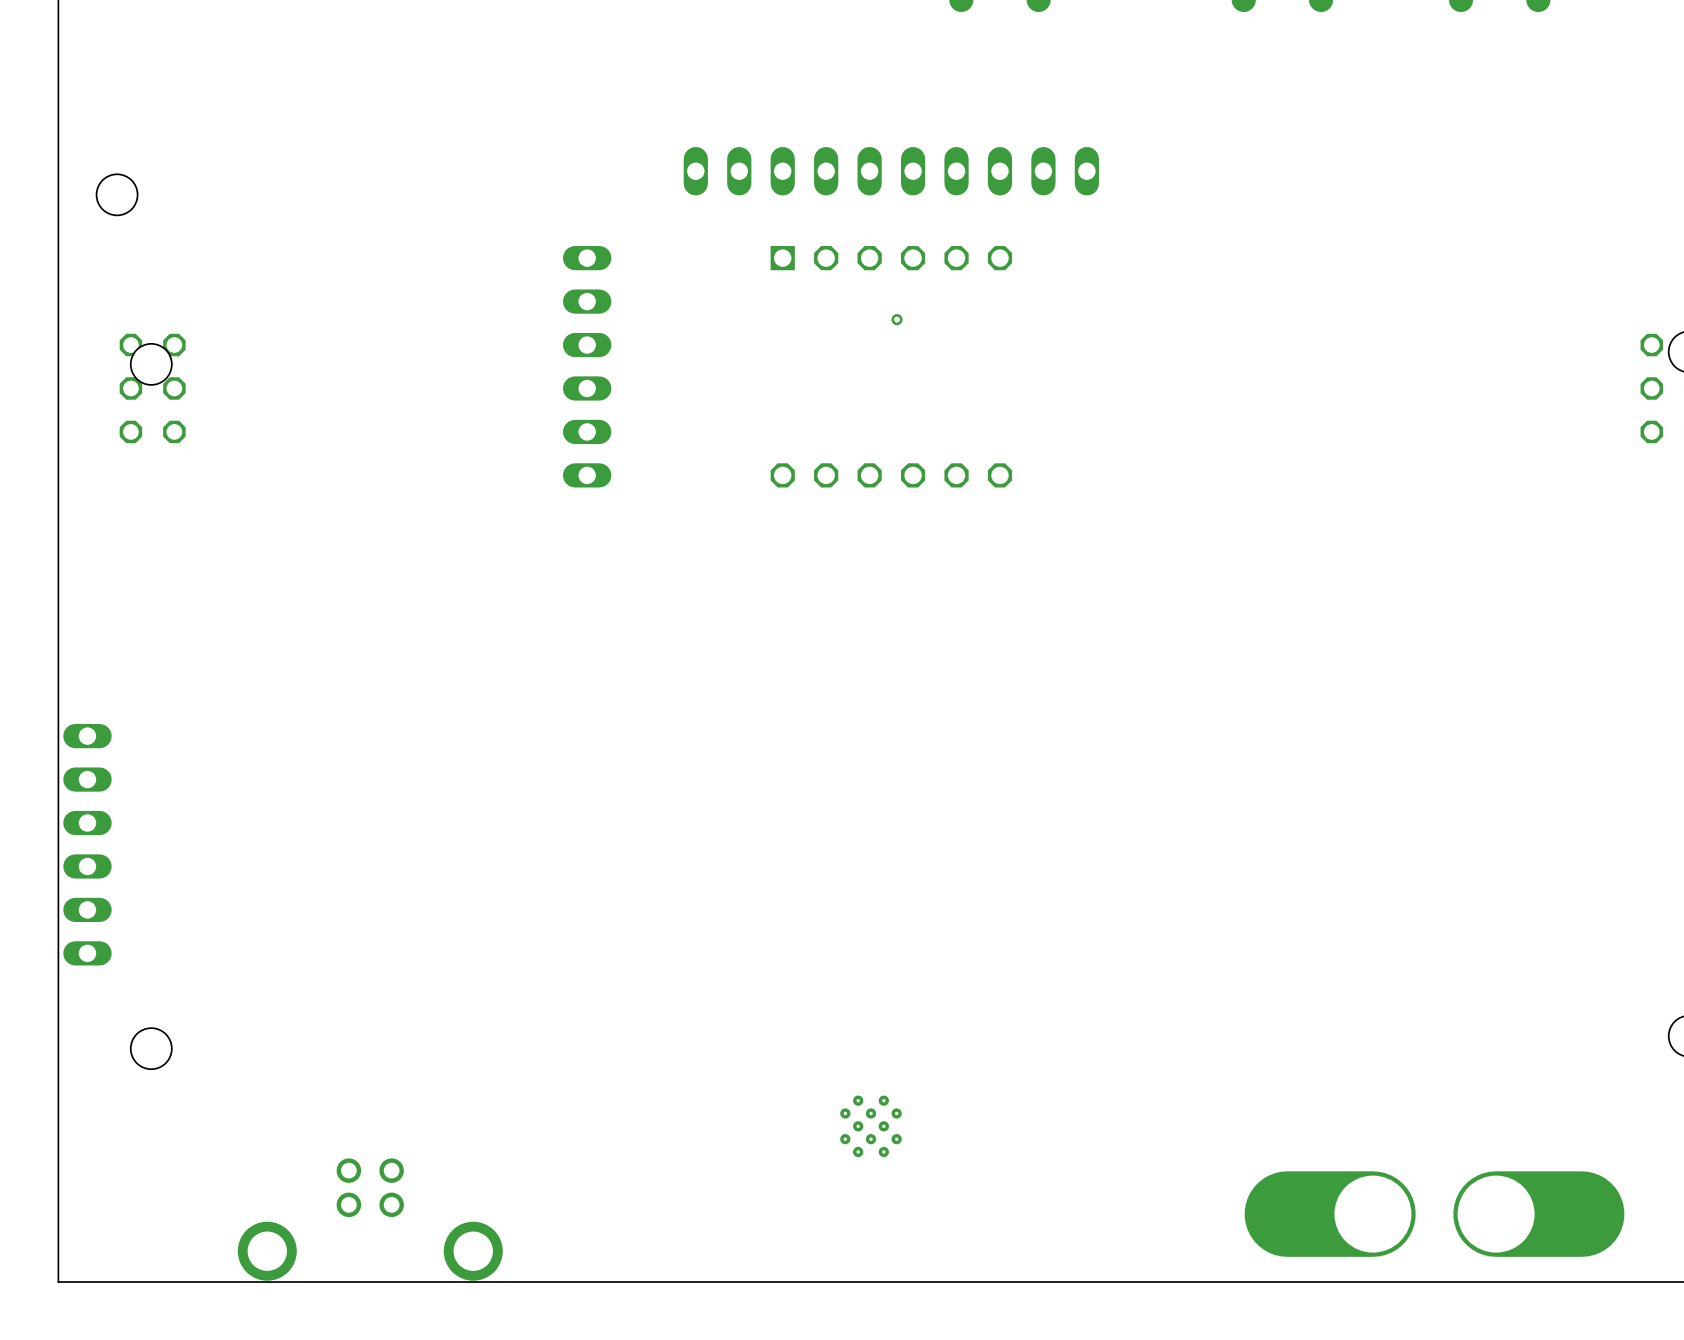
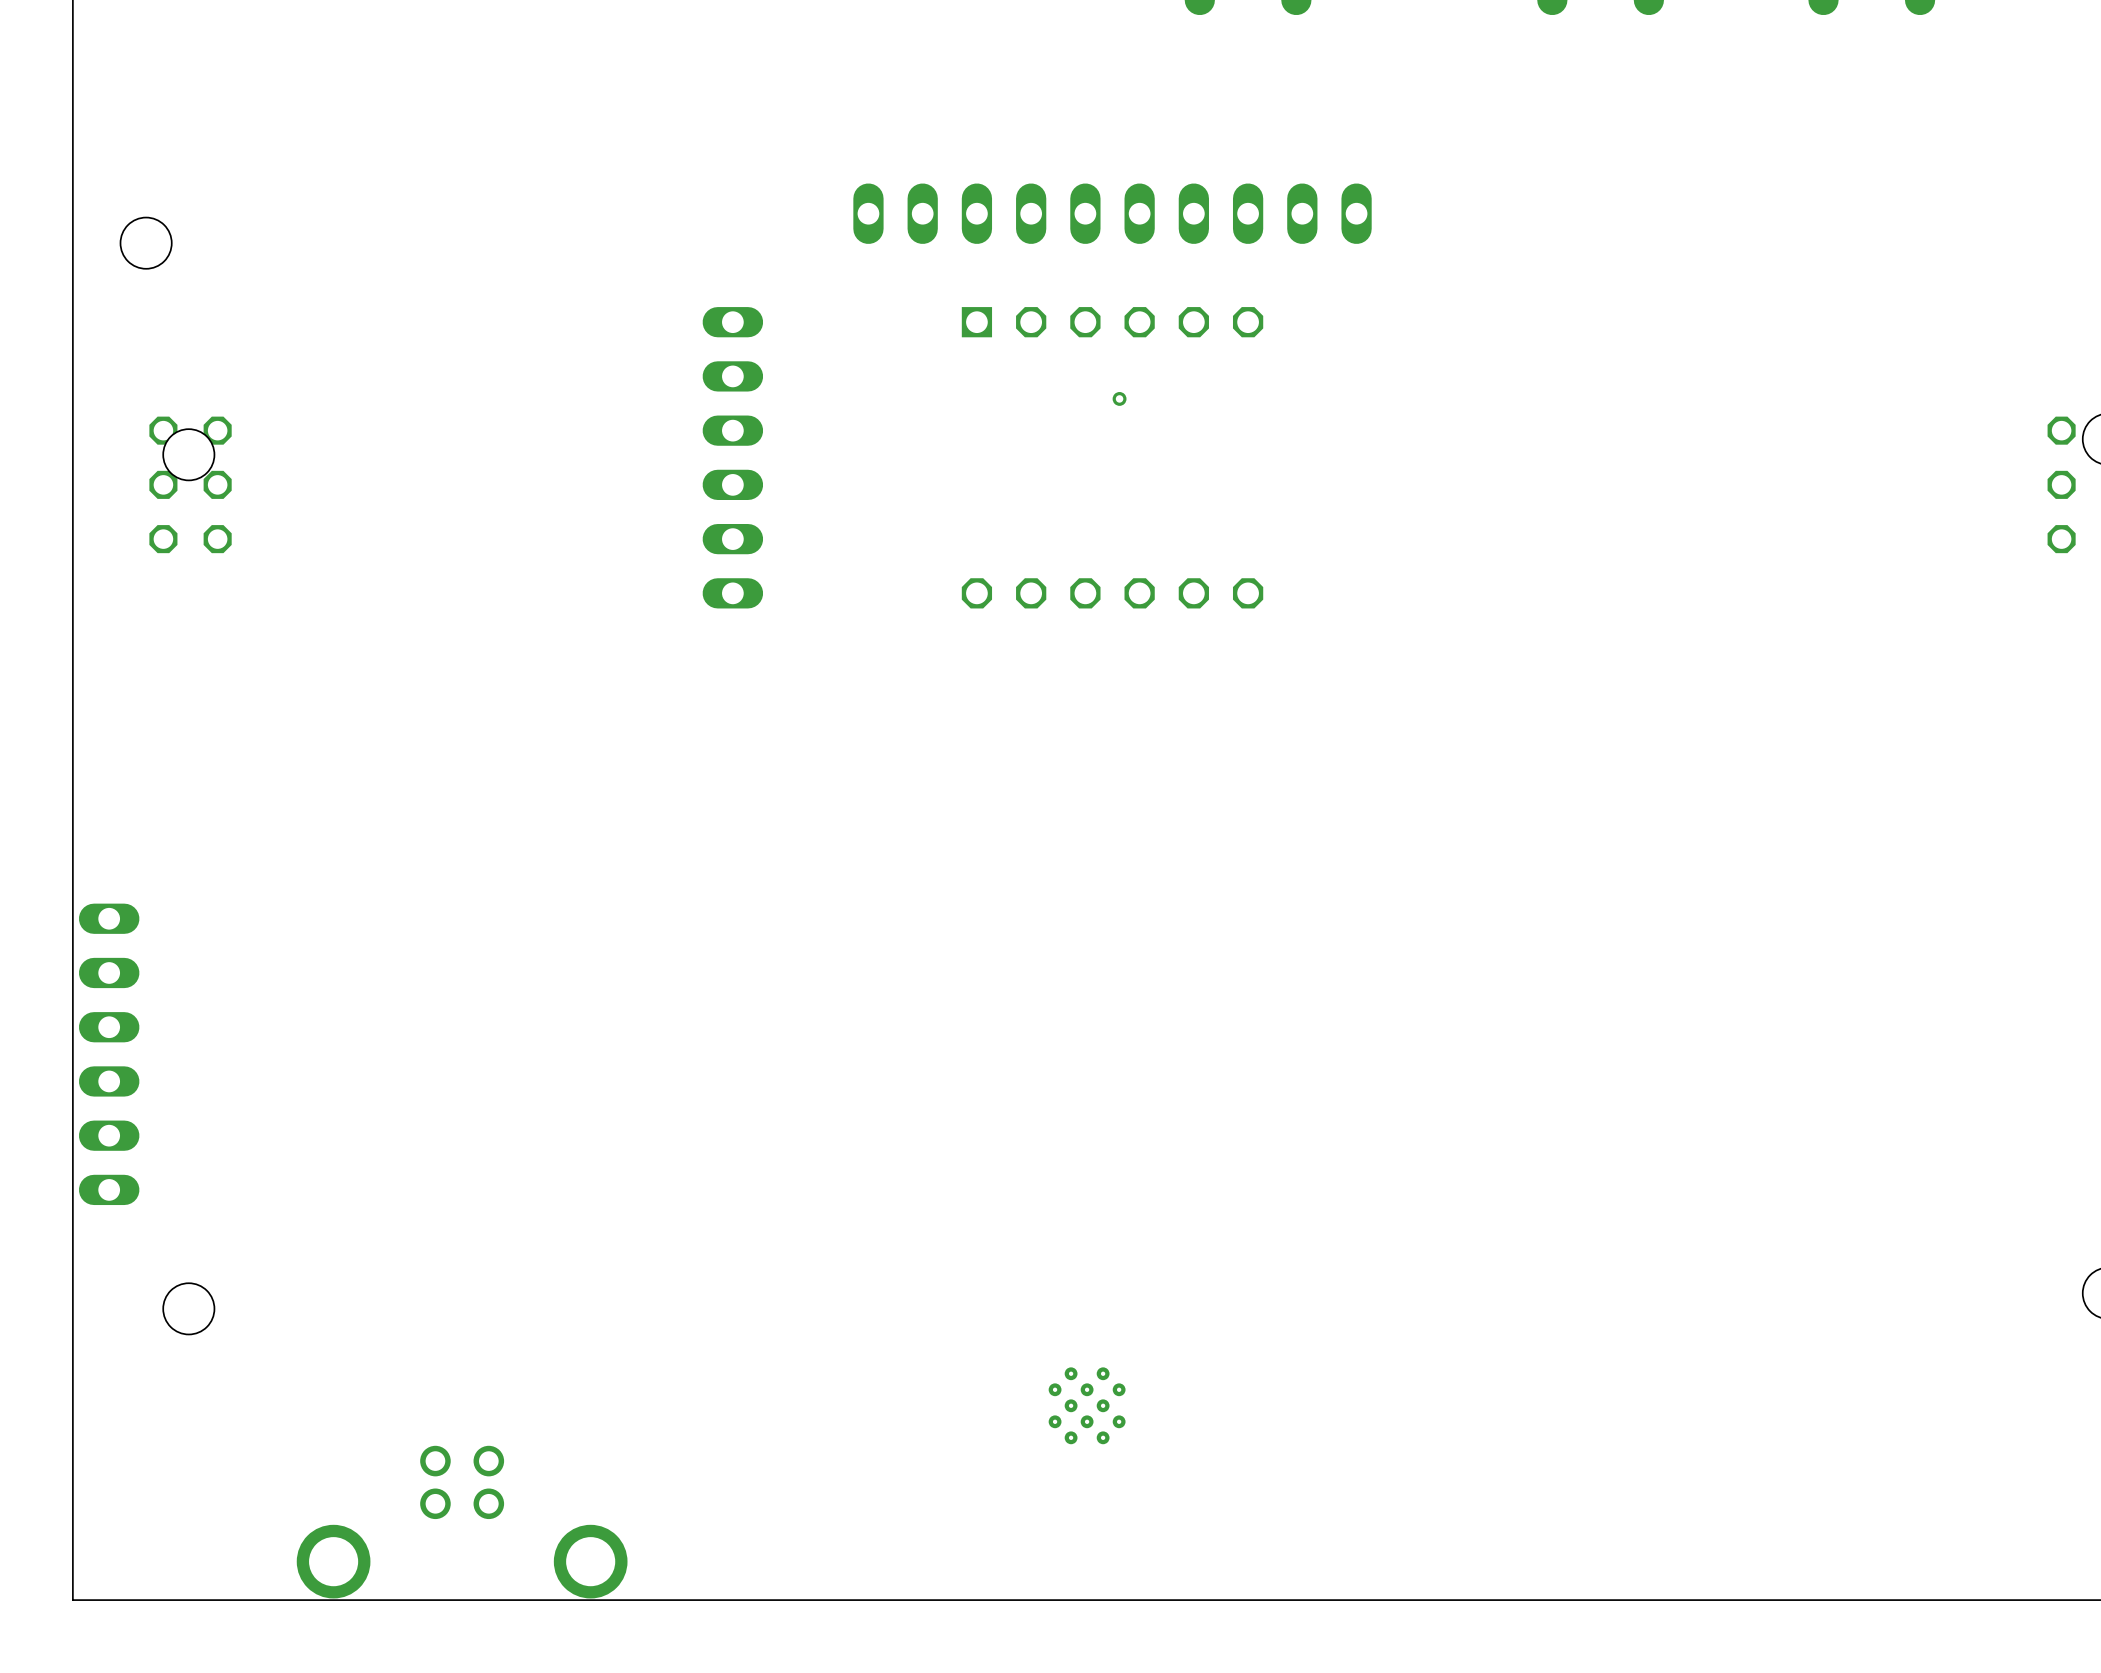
part: (1434, 1214) -> none

